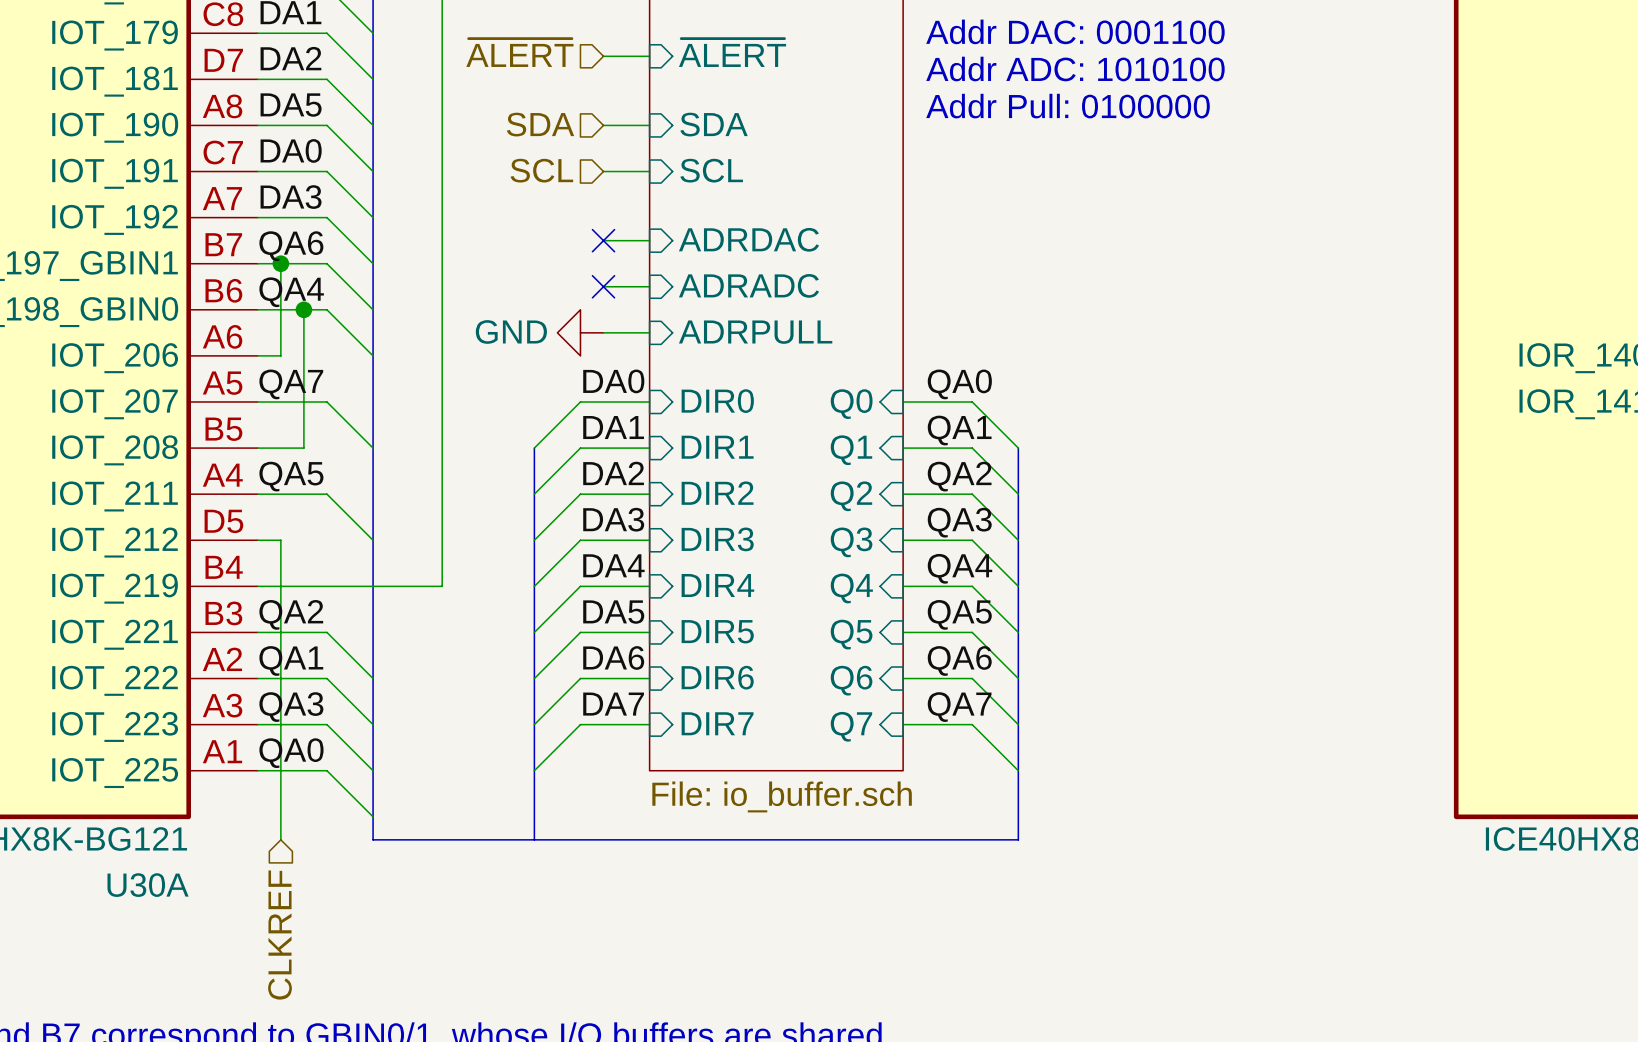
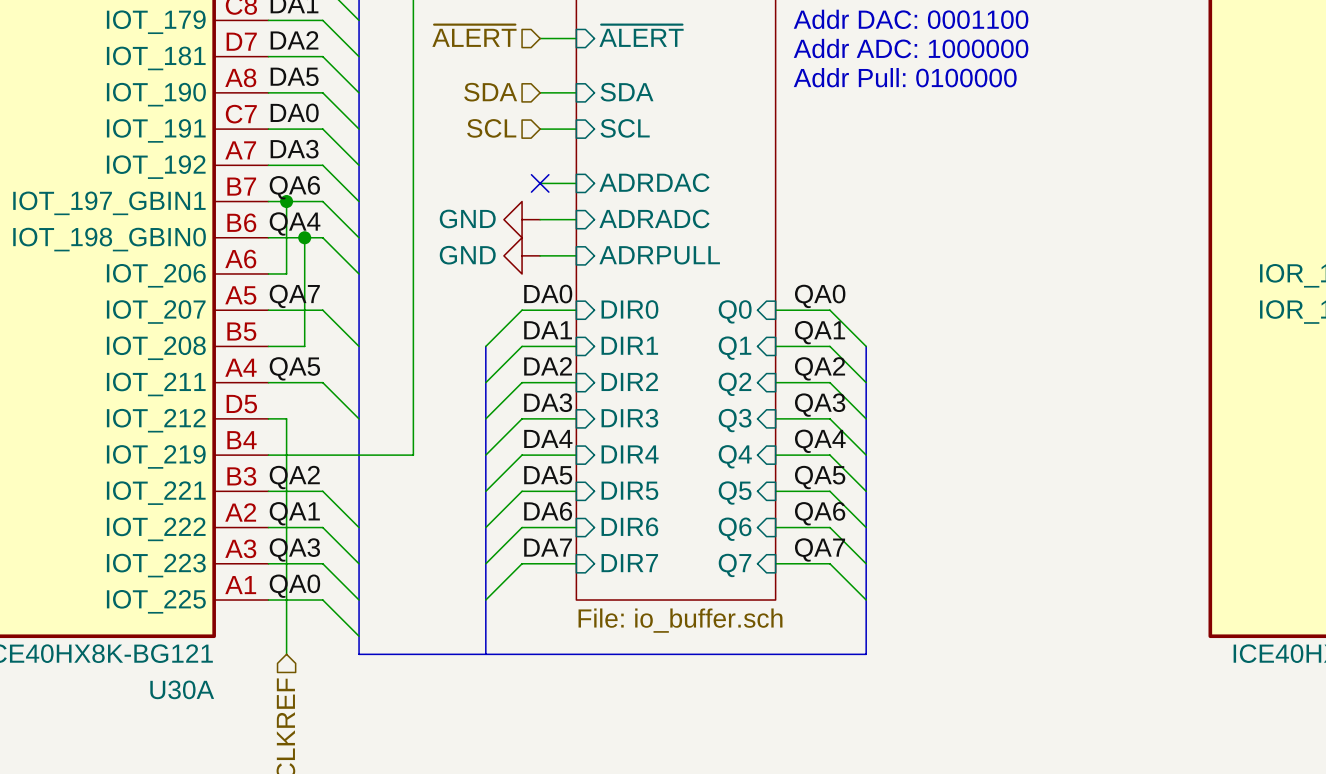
text: Addr ADC: 1010100 (1075, 69) -> Addr ADC: 1000000 (911, 48)
power symbol: none -> GND (522, 219)
no-connect mark: (603, 286) -> none

